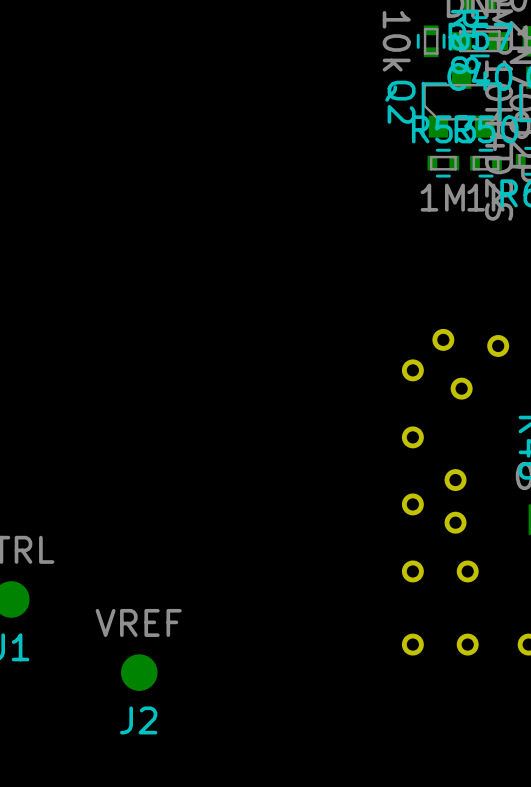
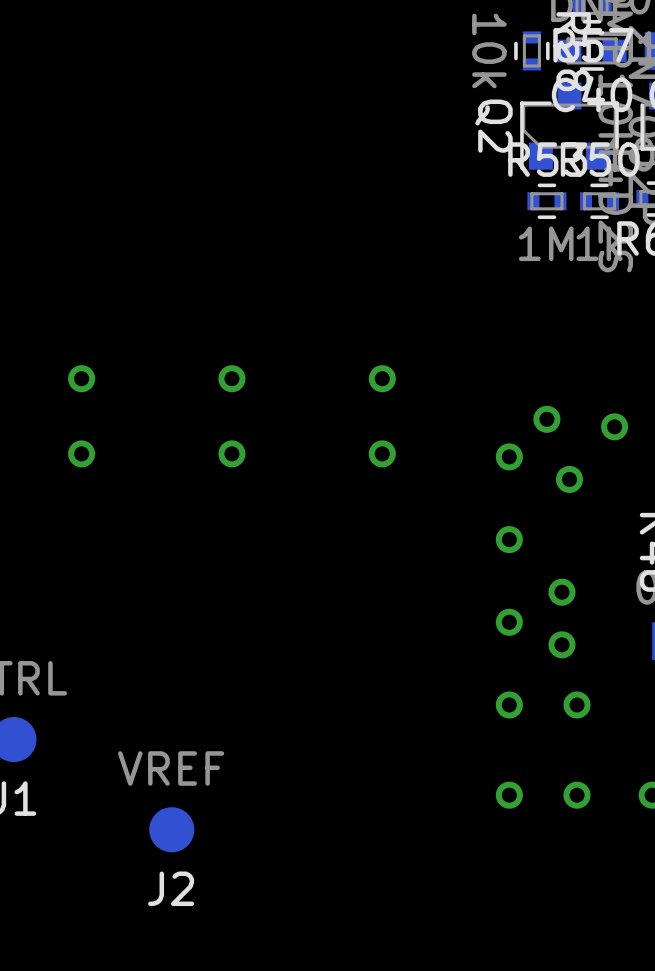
part: none -> (81, 378)
part: none -> (231, 378)
part: none -> (382, 378)
part: none -> (81, 453)
part: none -> (231, 453)
part: none -> (382, 453)

